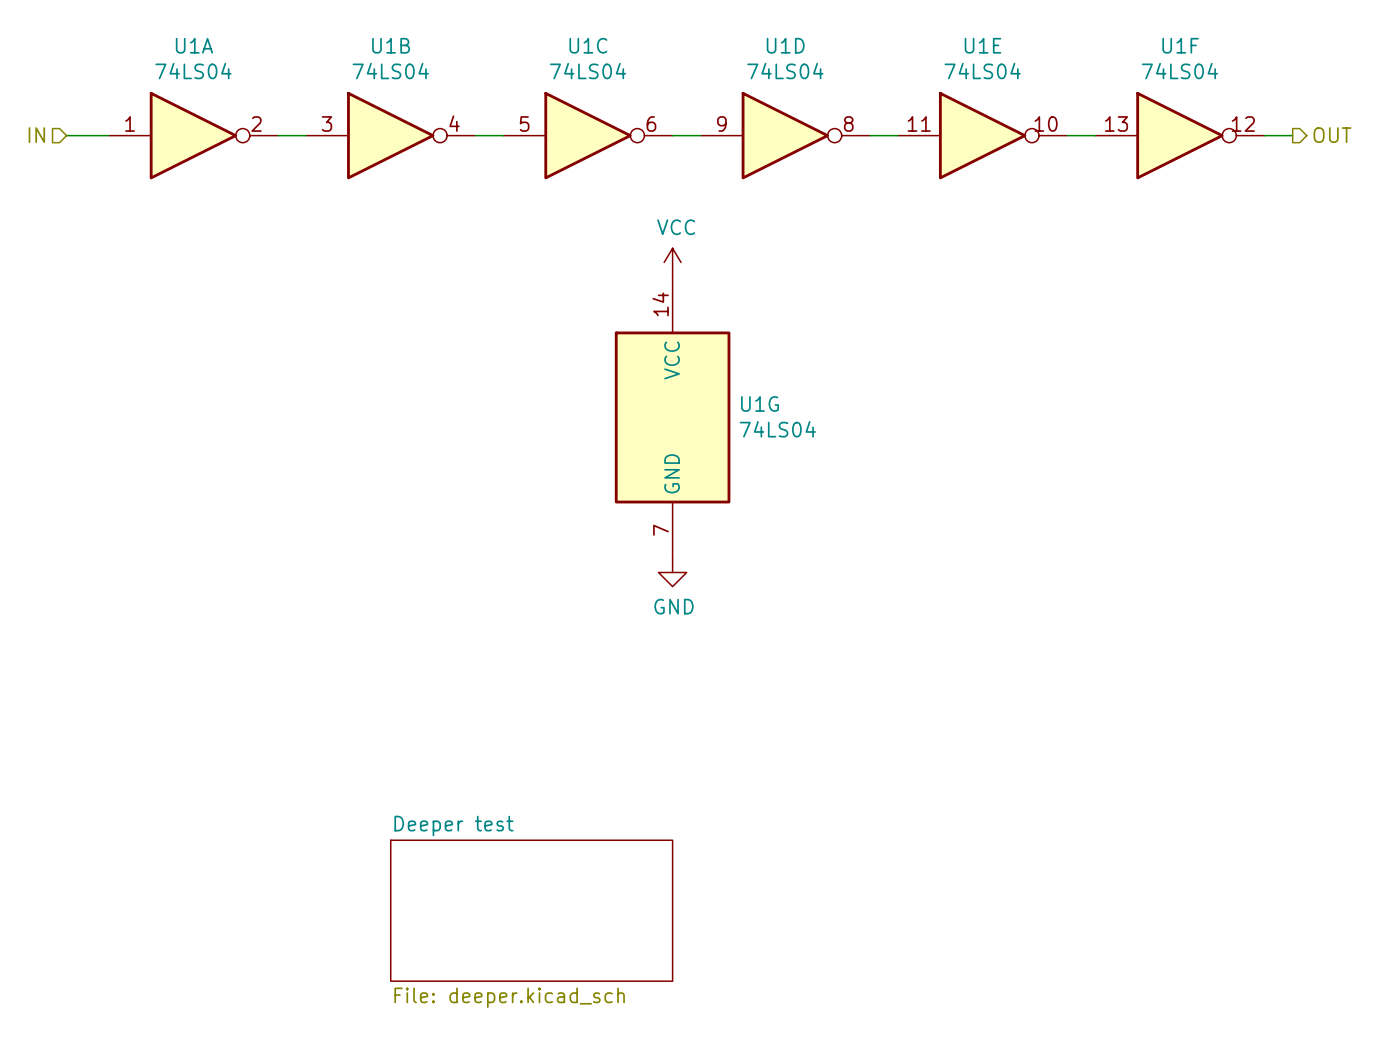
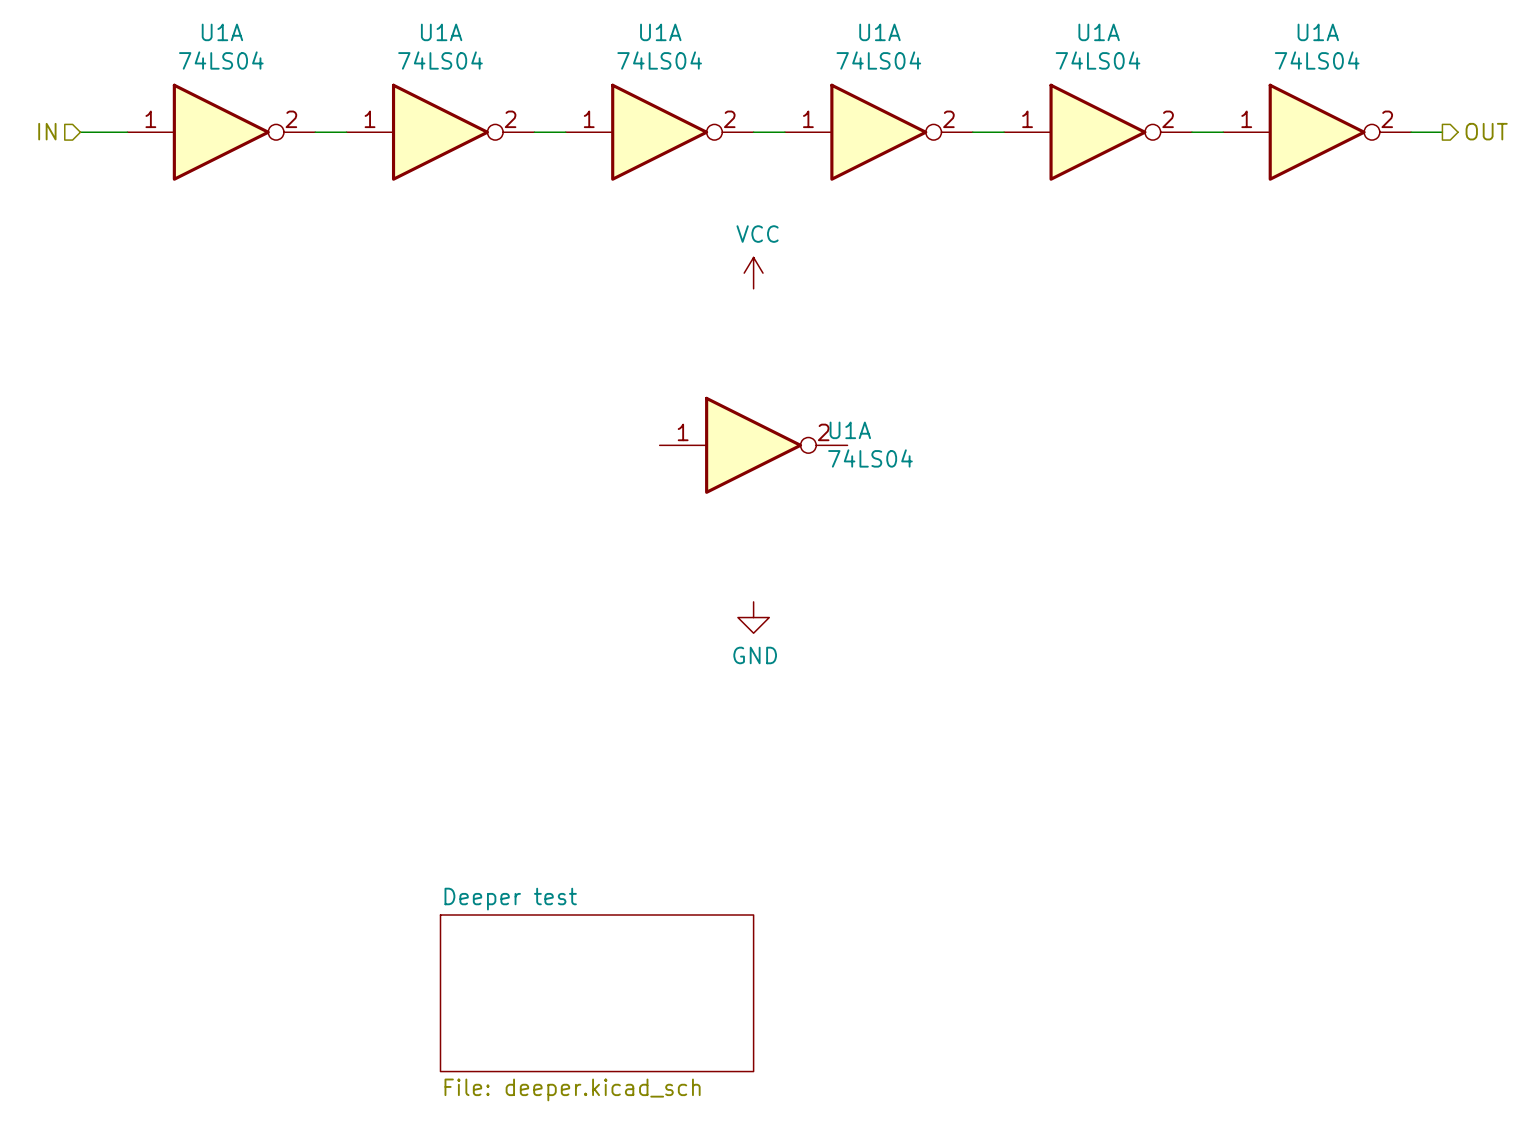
U1B name: U1B (391, 45) -> U1A (441, 32)
U1C name: U1C (588, 45) -> U1A (660, 32)
U1D name: U1D (785, 45) -> U1A (879, 32)
U1E name: U1E (982, 45) -> U1A (1099, 32)
U1F name: U1F (1180, 45) -> U1A (1318, 32)
U1B pin number: 4 (454, 123) -> 2 (510, 119)
U1B pin number: 3 (326, 124) -> 1 (370, 119)
U1C pin number: 5 (524, 124) -> 1 (589, 119)
U1C pin number: 6 (651, 124) -> 2 (729, 119)
U1D pin number: 9 (721, 124) -> 1 (808, 119)
U1D pin number: 8 (848, 124) -> 2 (948, 119)
U1E pin number: 11 (919, 124) -> 1 (1027, 119)
U1E pin number: 10 (1046, 124) -> 2 (1168, 119)
U1F pin number: 13 (1116, 124) -> 1 (1246, 119)
U1F pin number: 12 (1243, 124) -> 2 (1387, 119)
U1G: 74LS04 (672, 417) -> none
U1A: none -> 74LS04 (753, 445)

